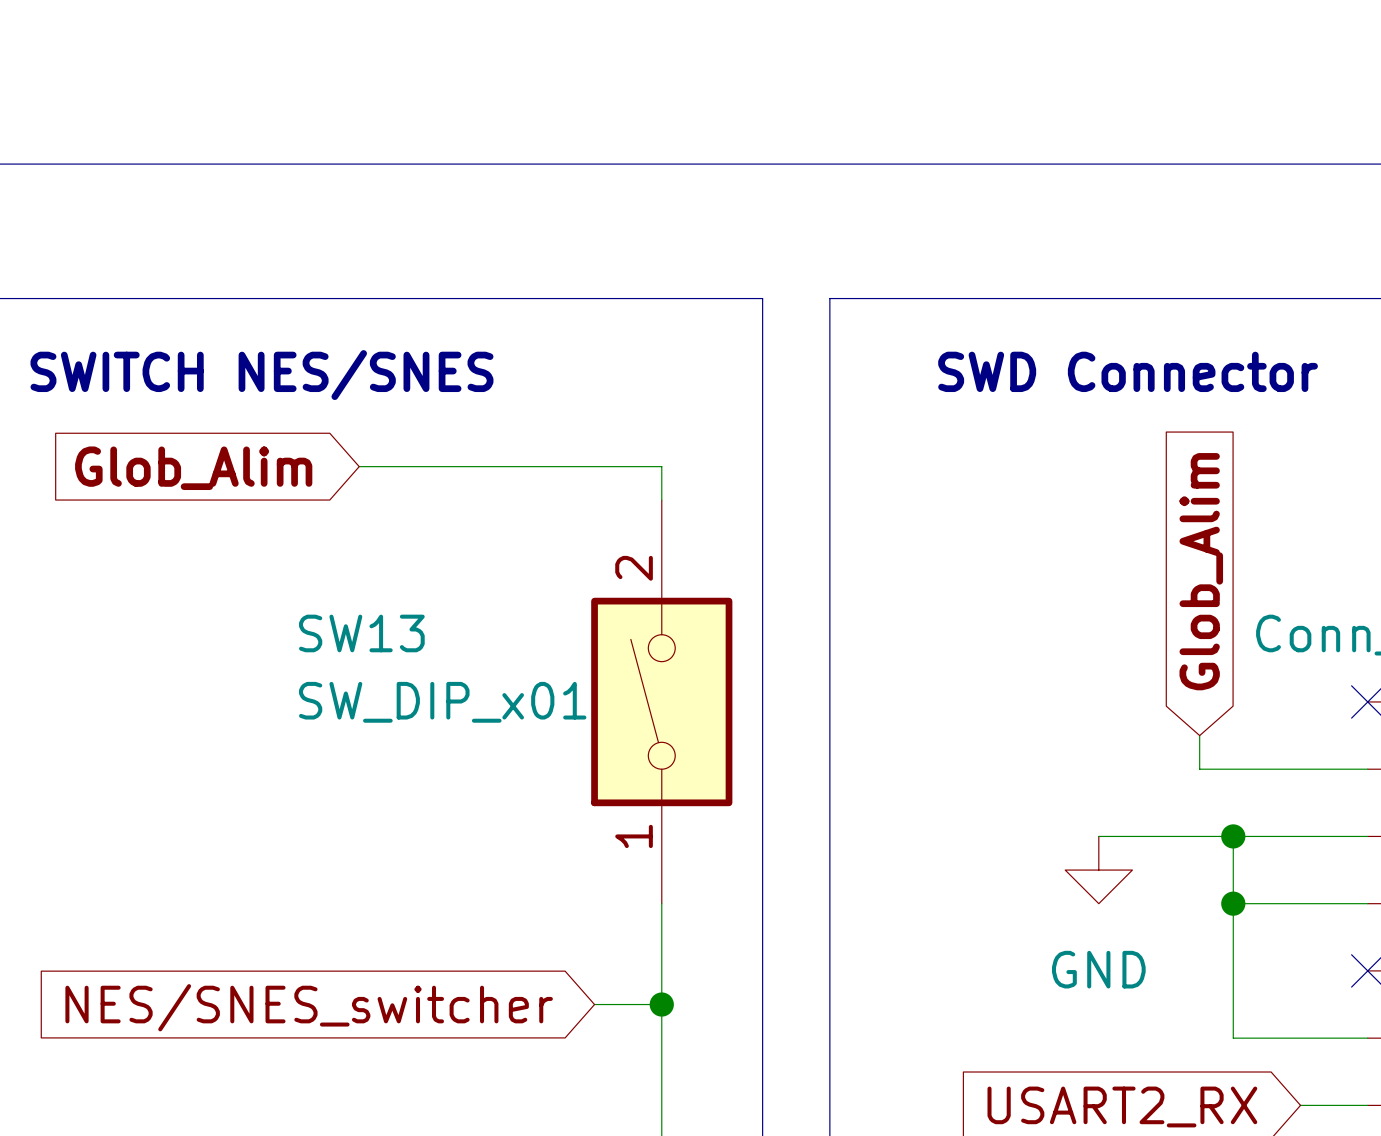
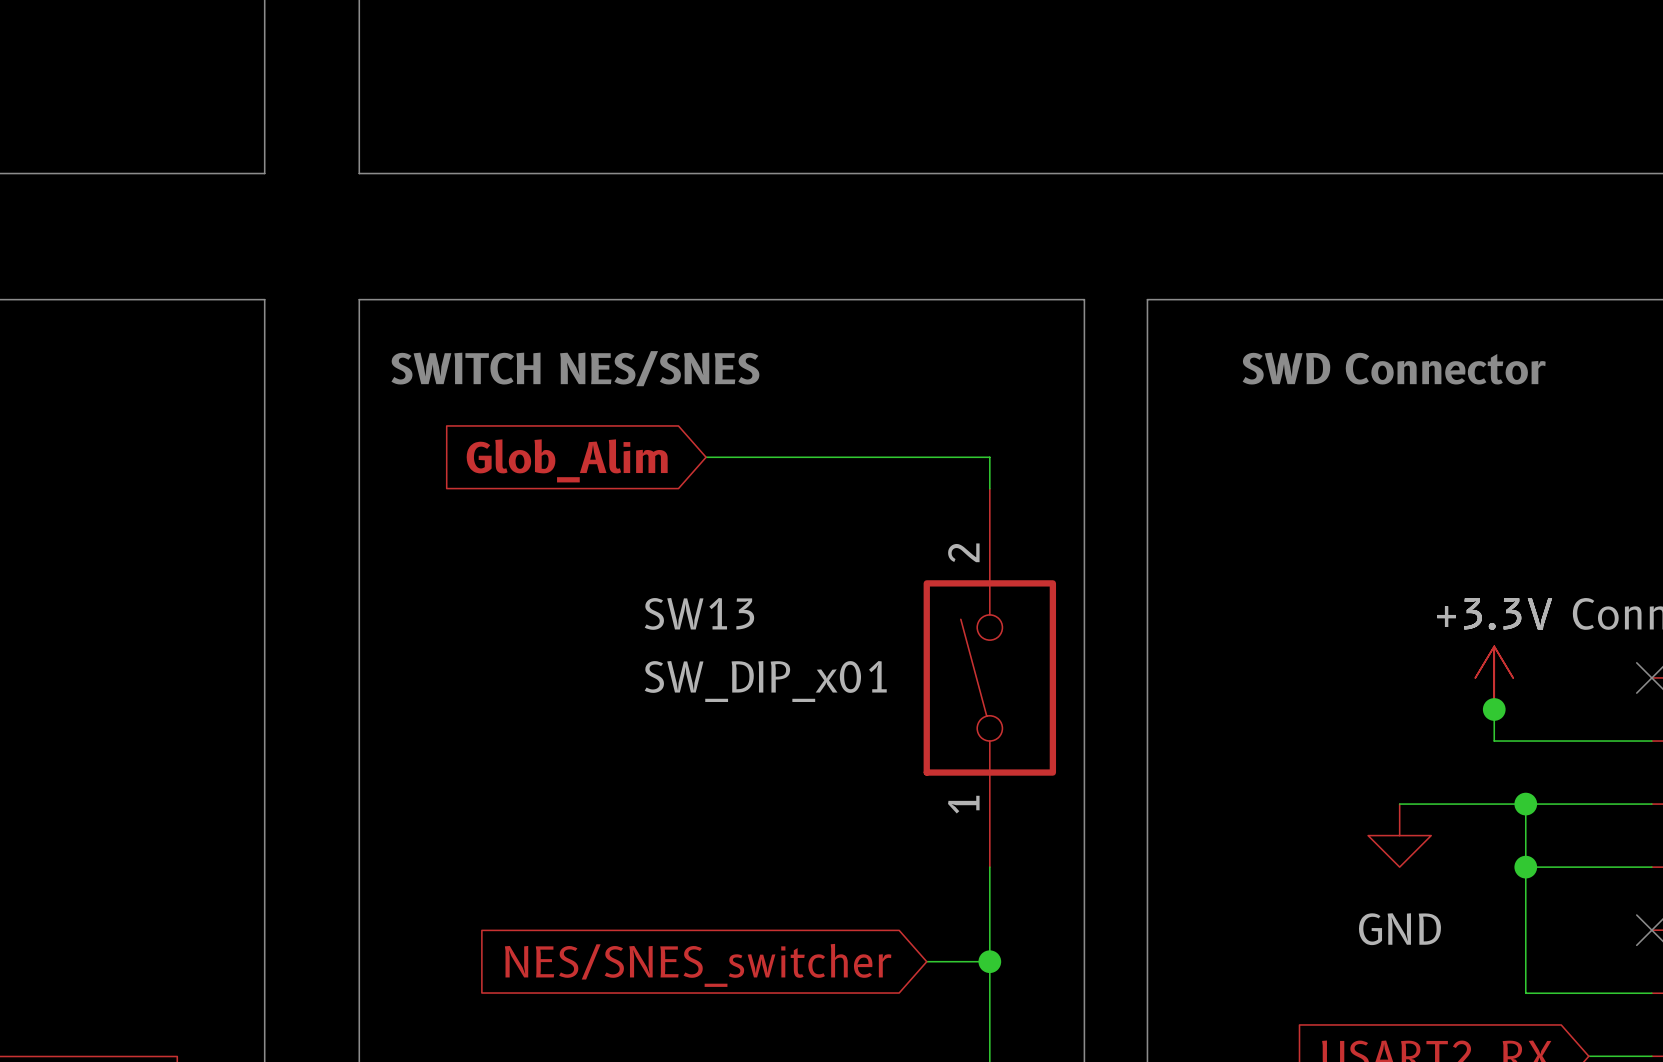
global label: Glob_Alim (1201, 571) -> none
power symbol: none -> +3.3V (1494, 677)
junction: none -> (1494, 709)

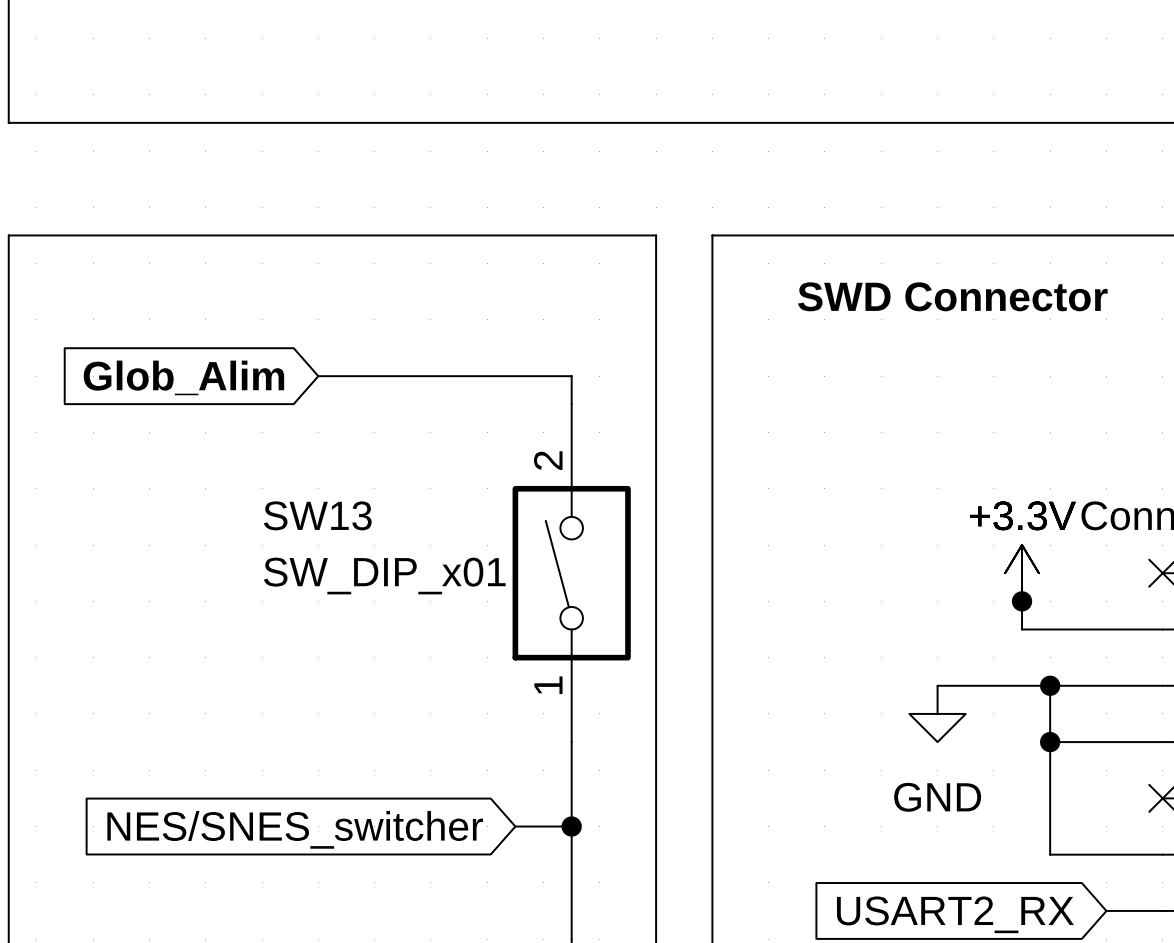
text: SWITCH NES/SNES (575, 368) -> none

